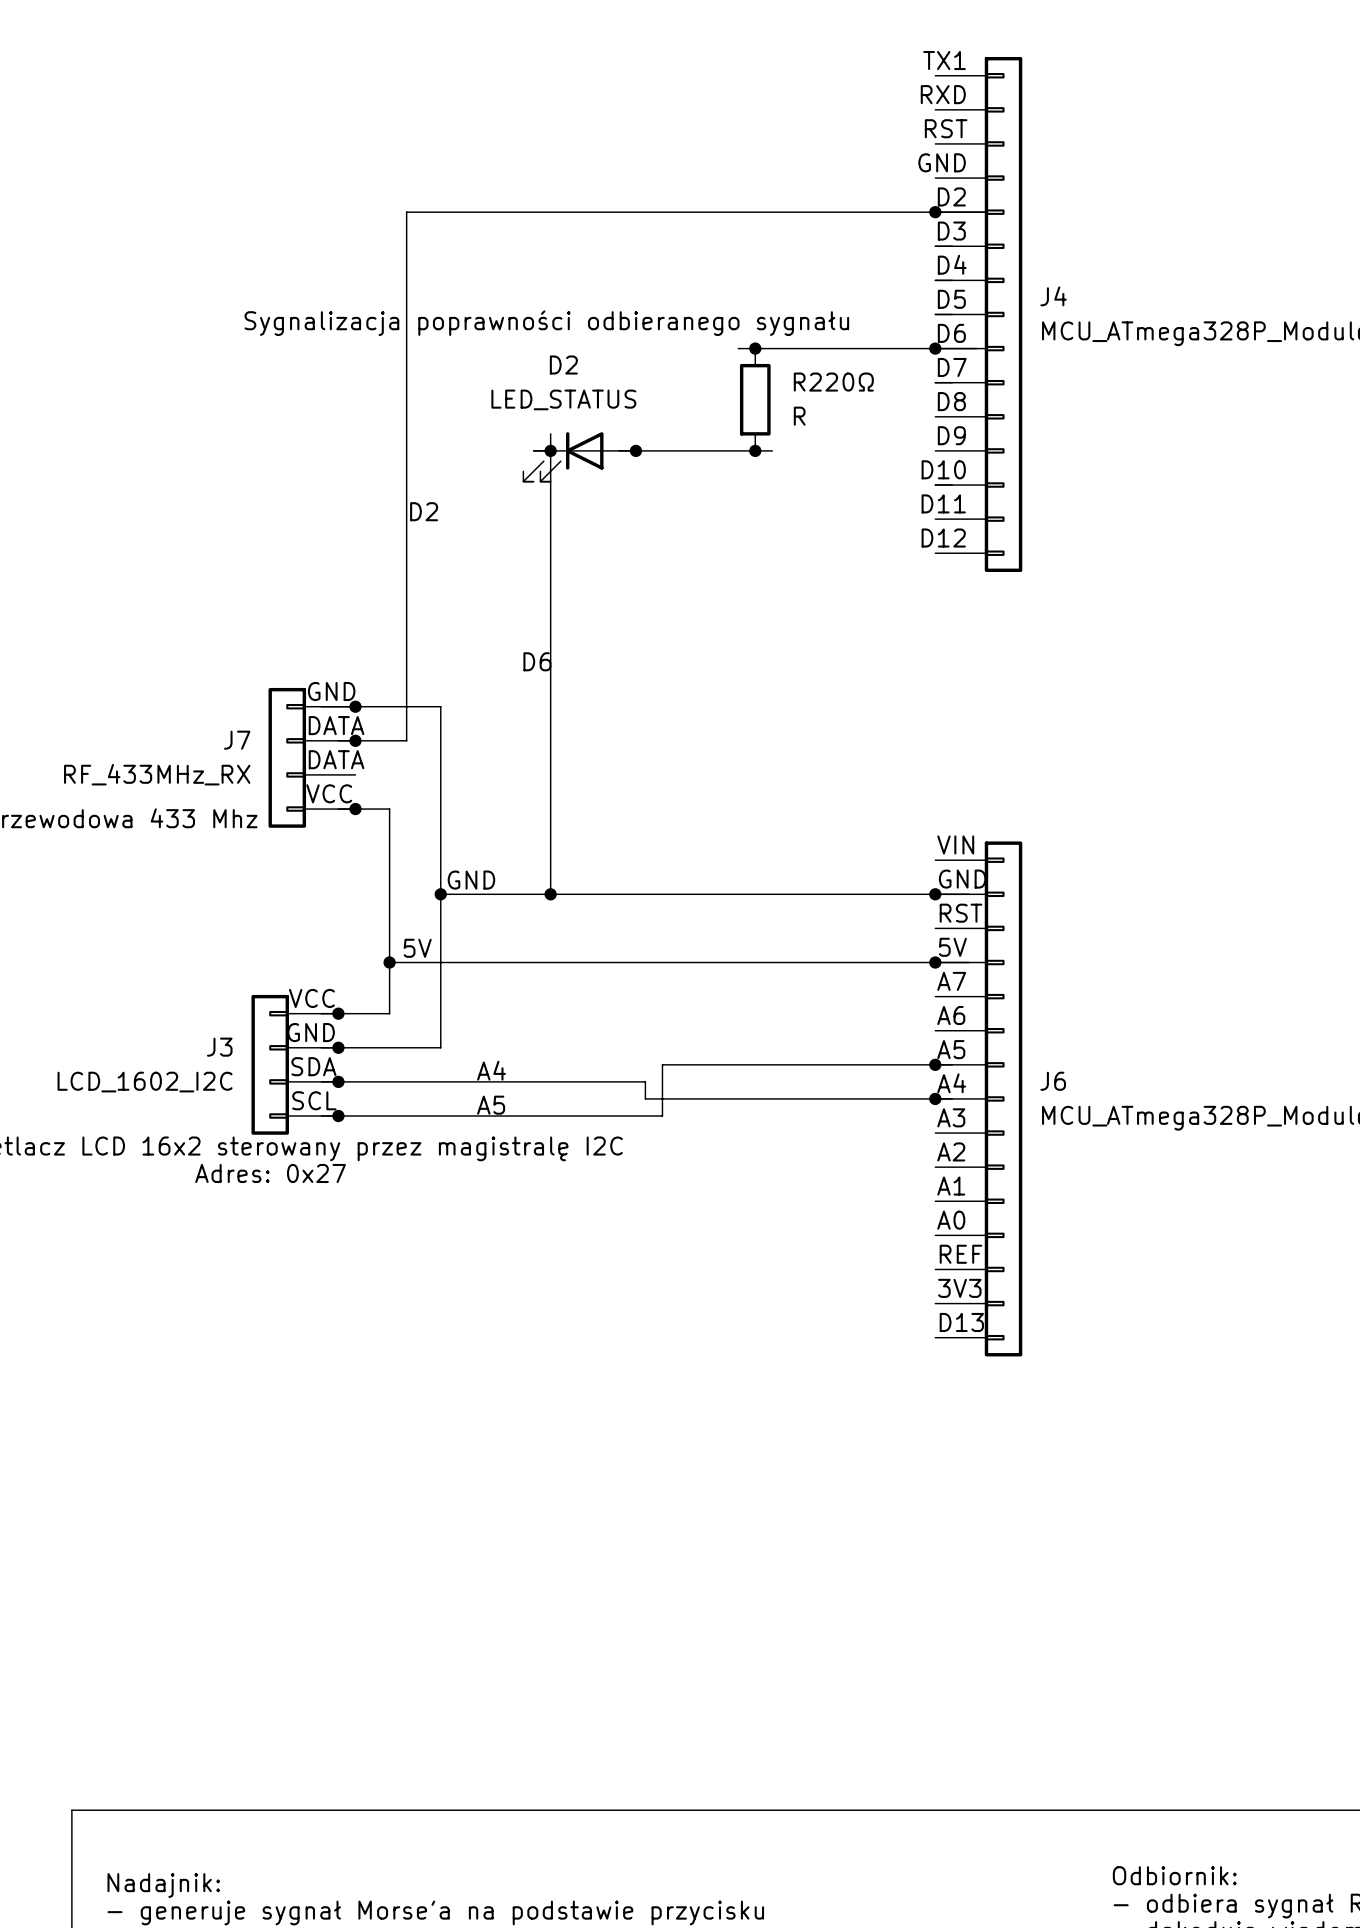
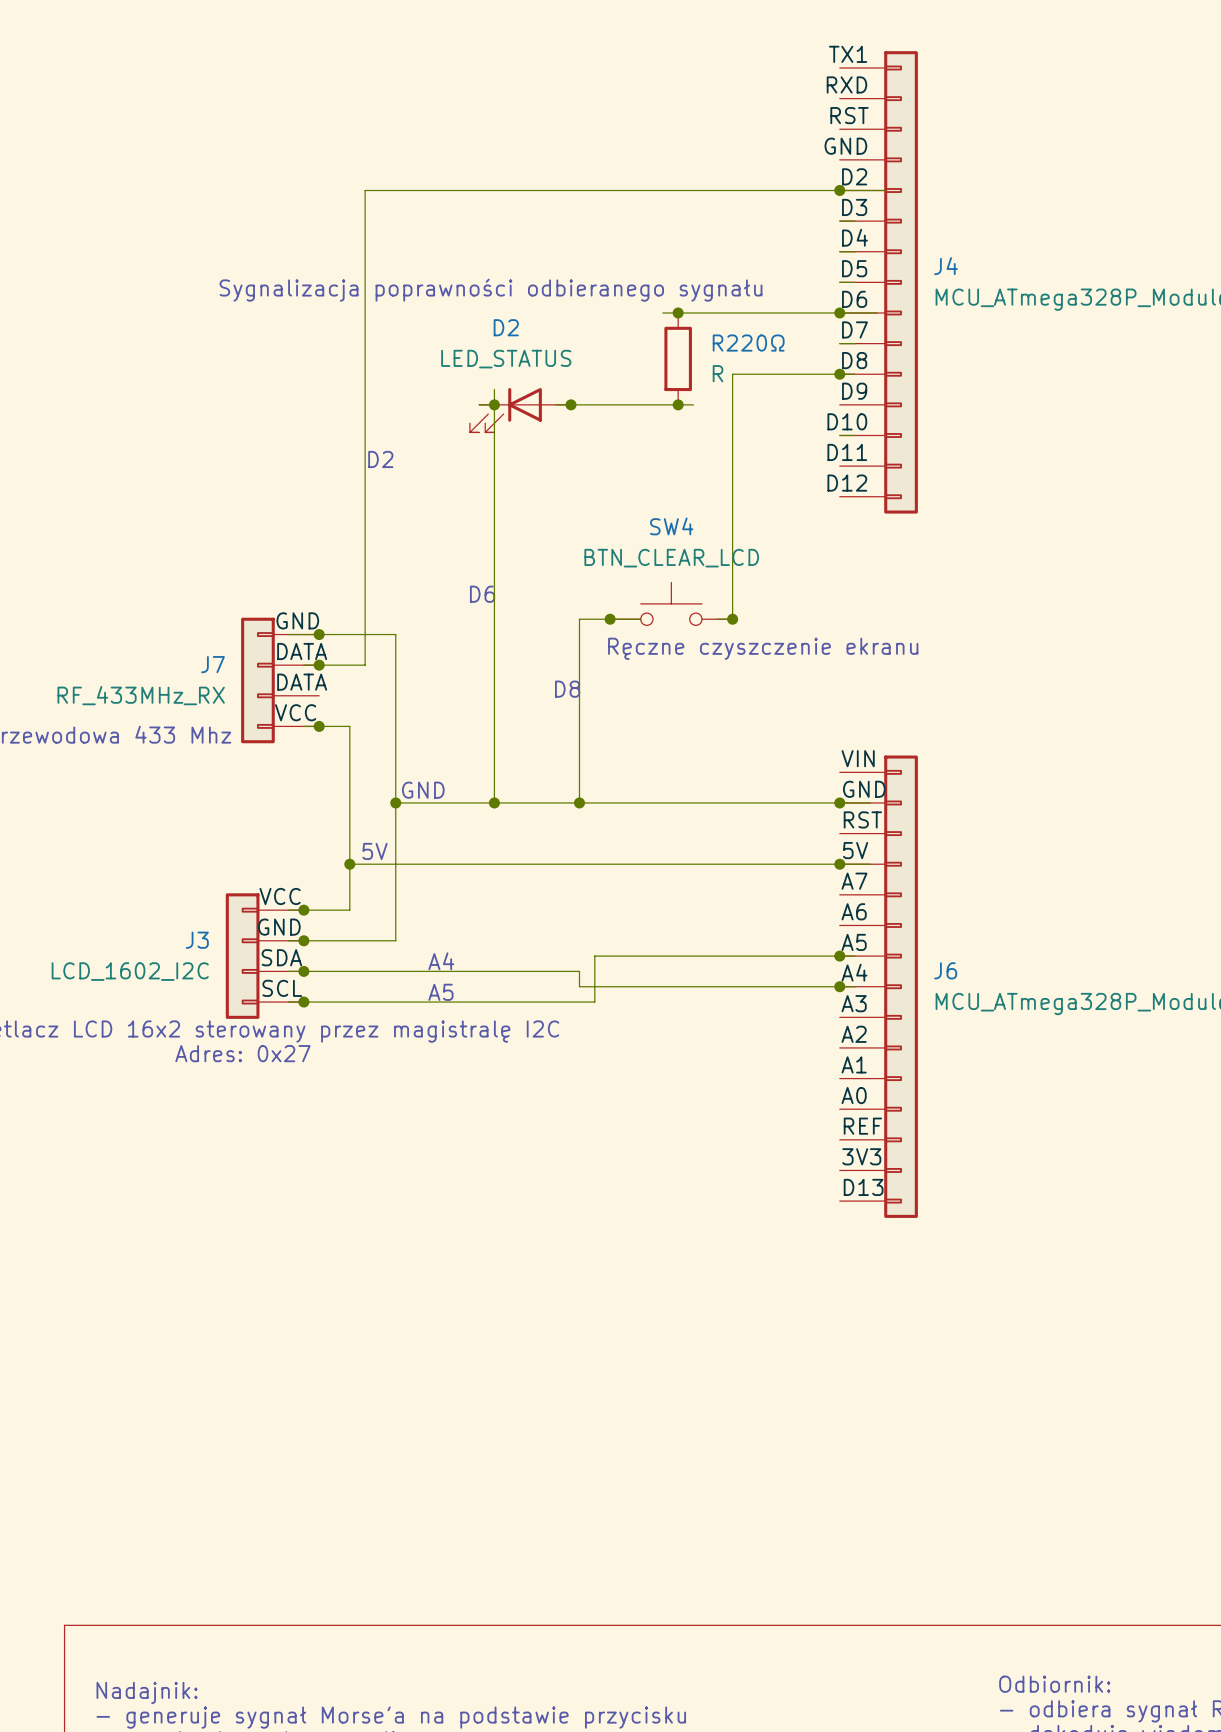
junction: none -> (839, 374)
wire: none -> (855, 374) (732, 374) (732, 619) (717, 619)
SW4: none -> BTN_CLEAR_LCD (671, 603)
junction: none -> (610, 619)
wire: none -> (640, 619) (579, 619) (579, 802)
junction: none -> (732, 619)
text: none -> Ręczne czyszczenie ekranu (763, 648)
text: none -> D8 (567, 689)
junction: none -> (579, 802)

